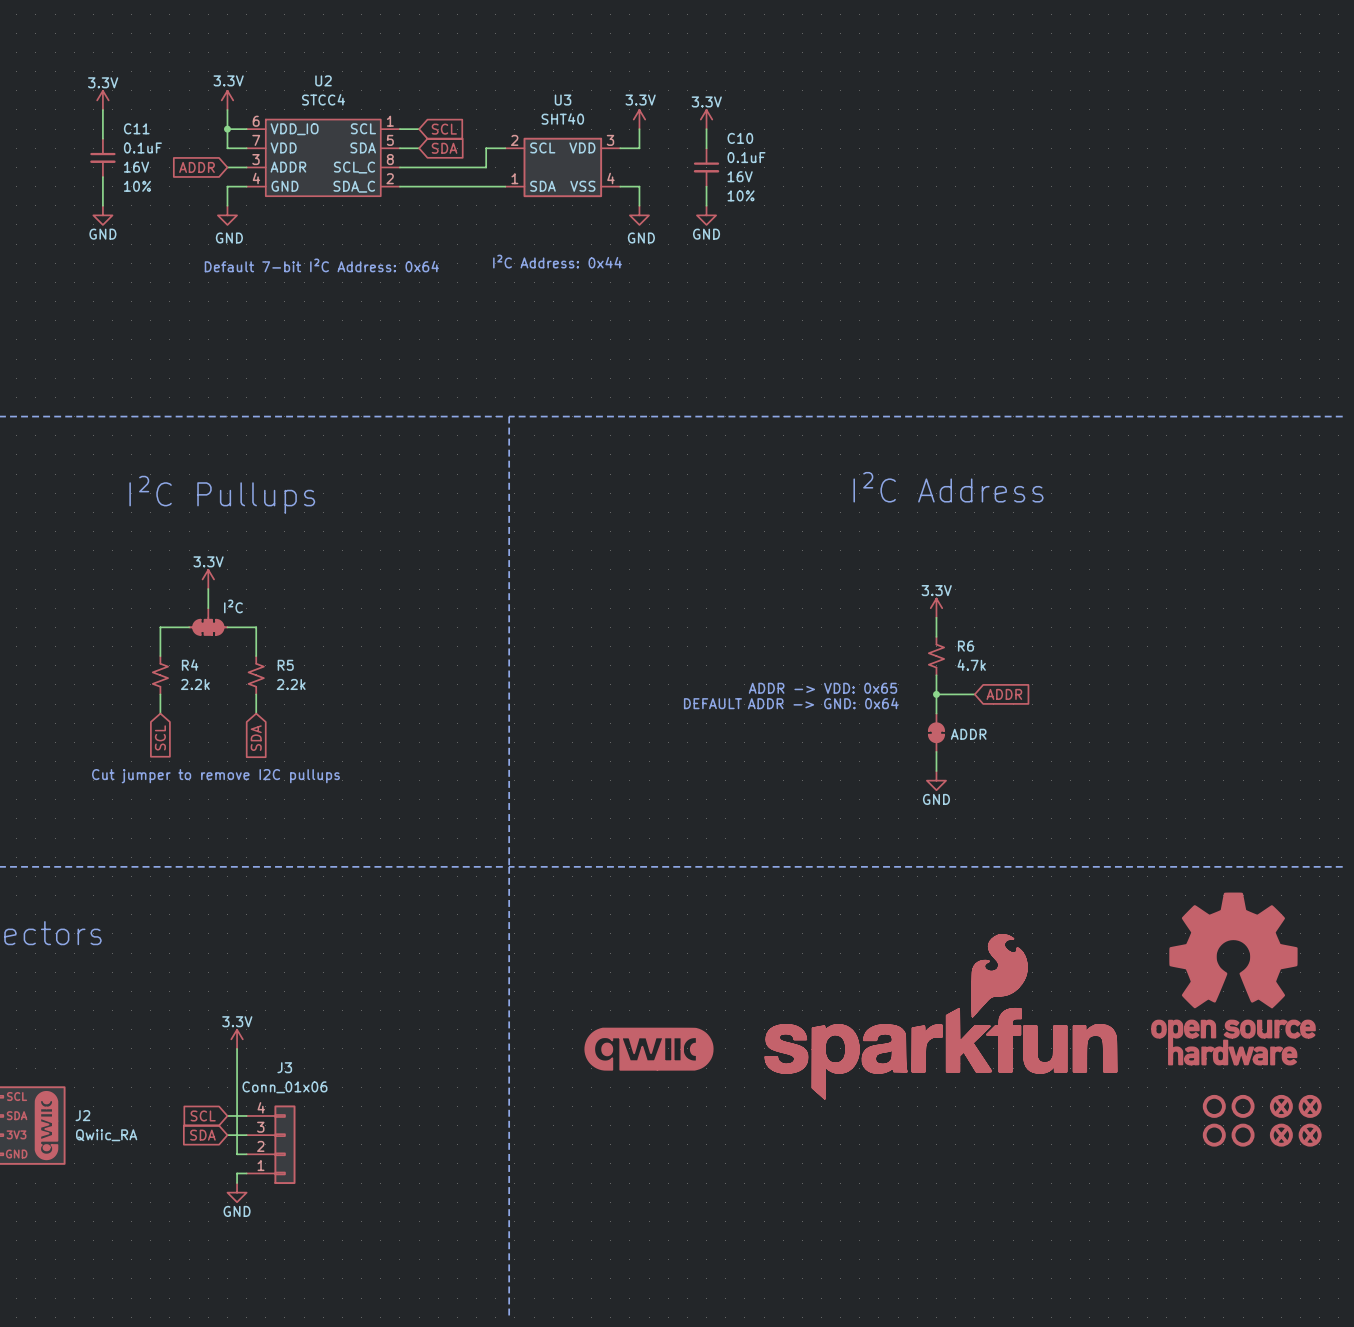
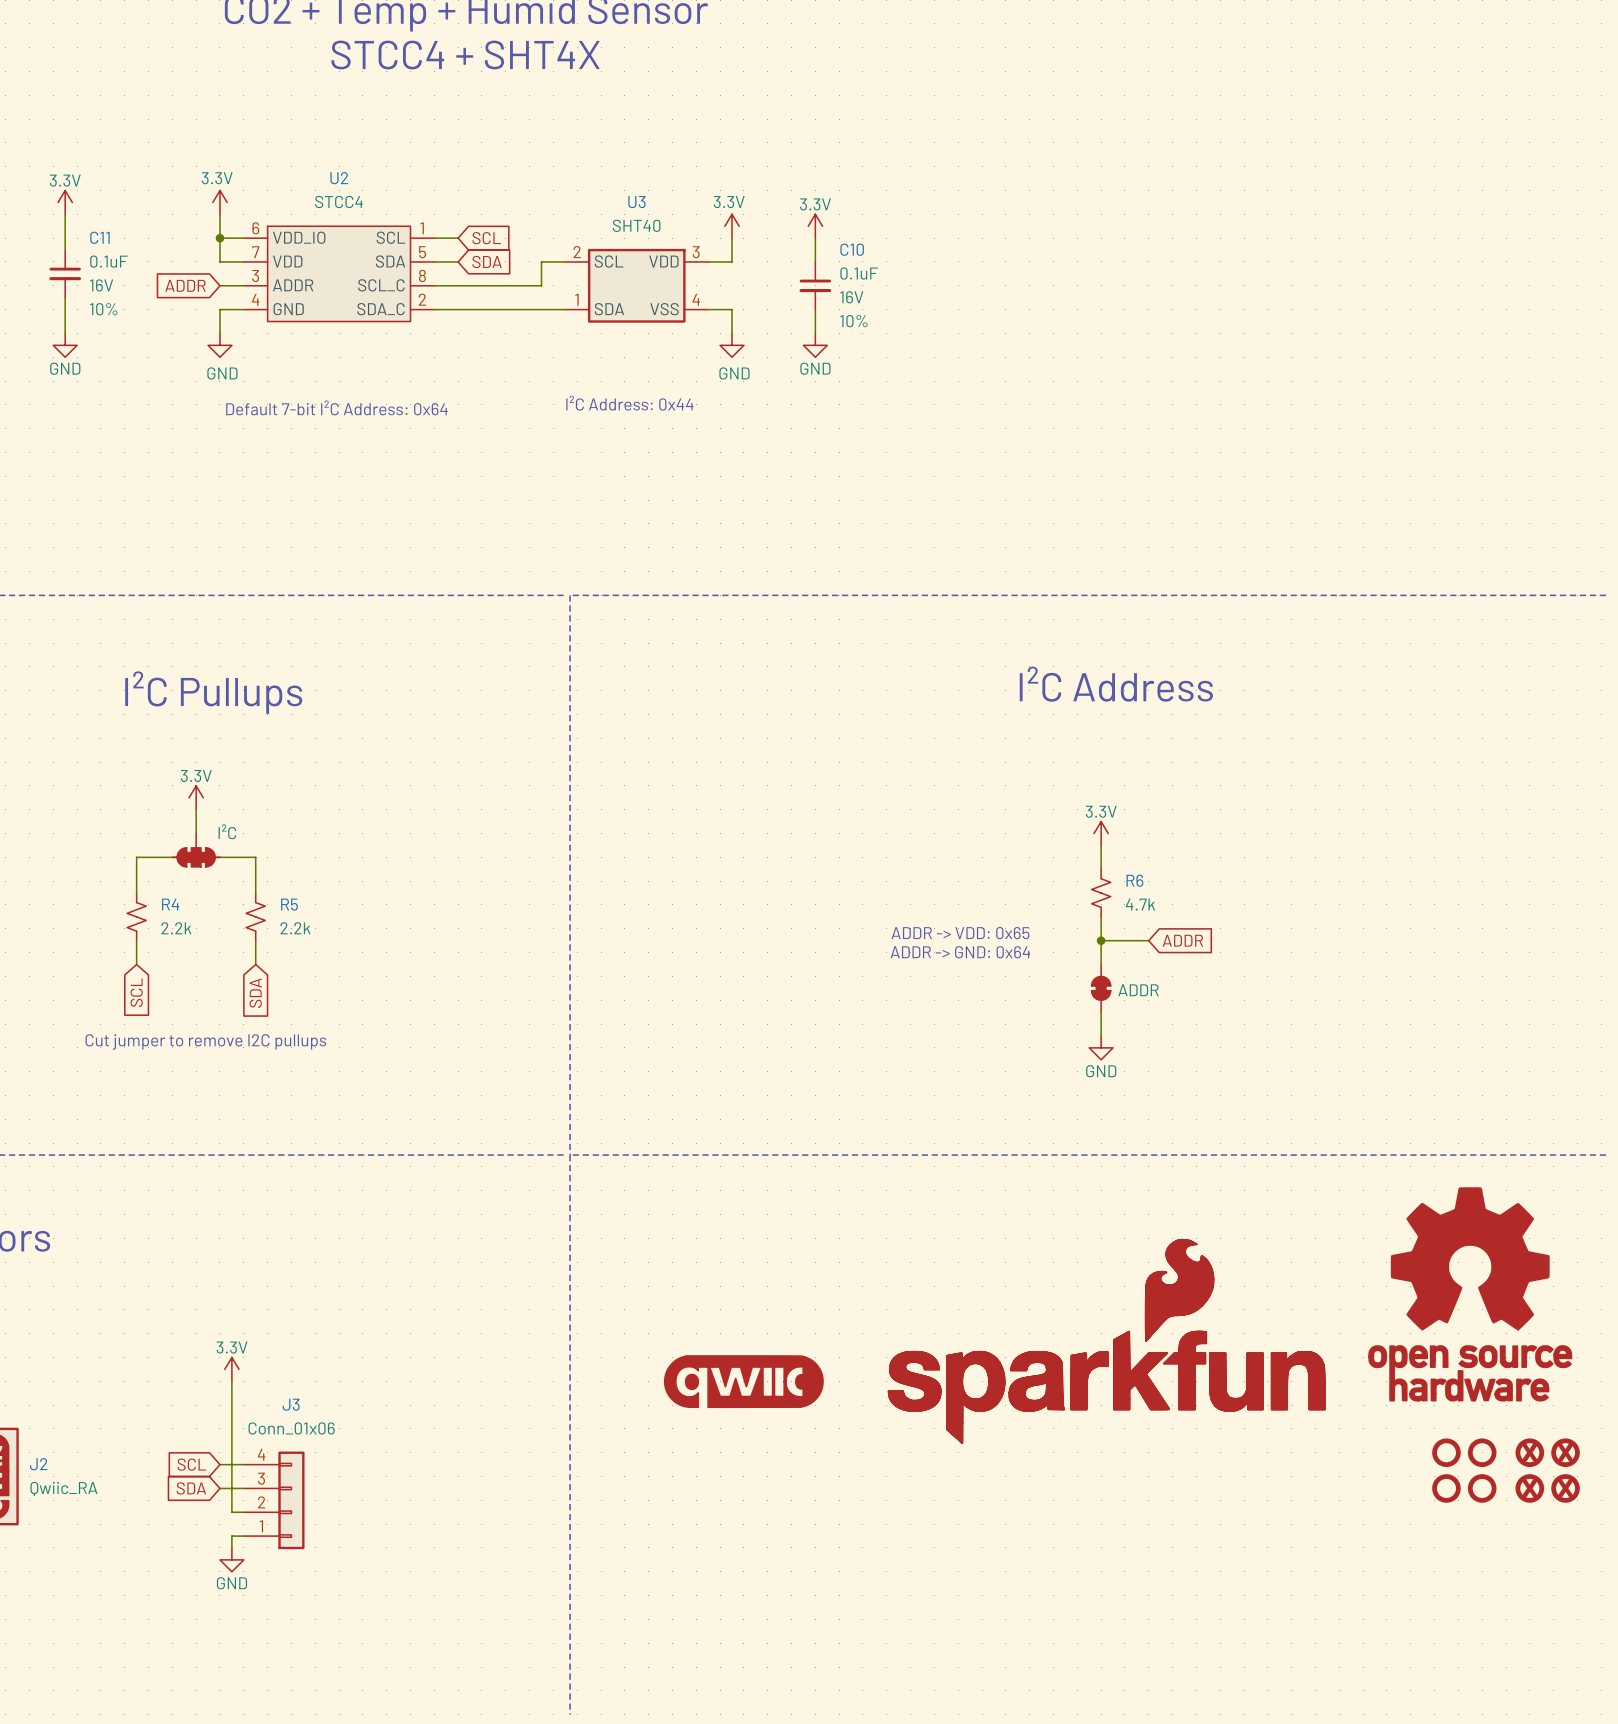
text: DEFAULT (712, 703) -> none

